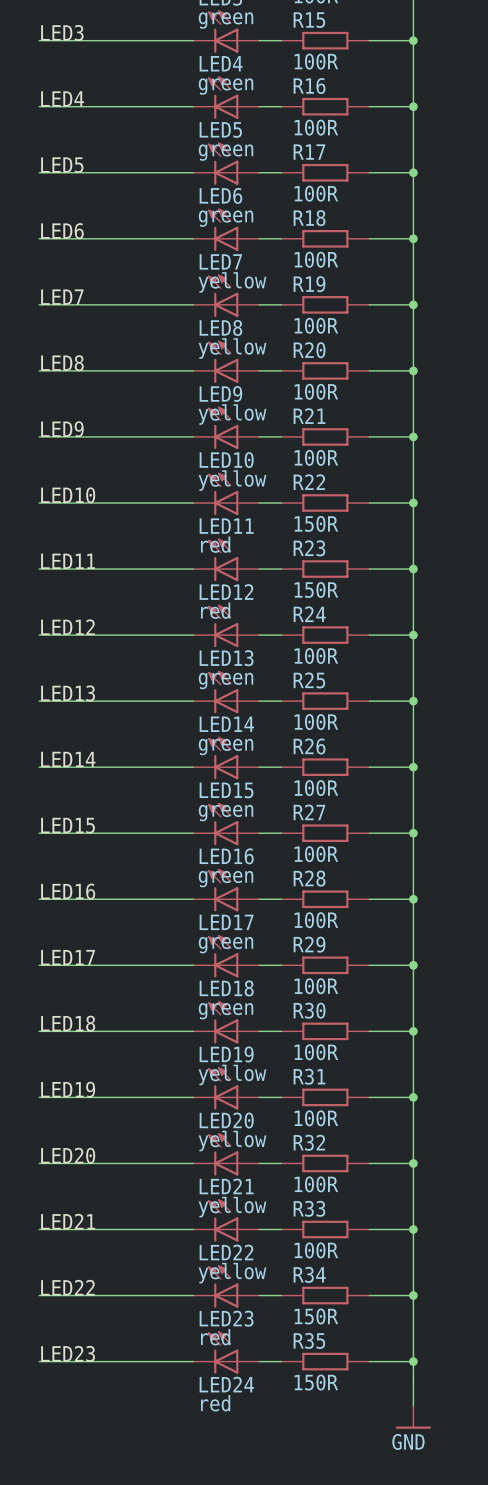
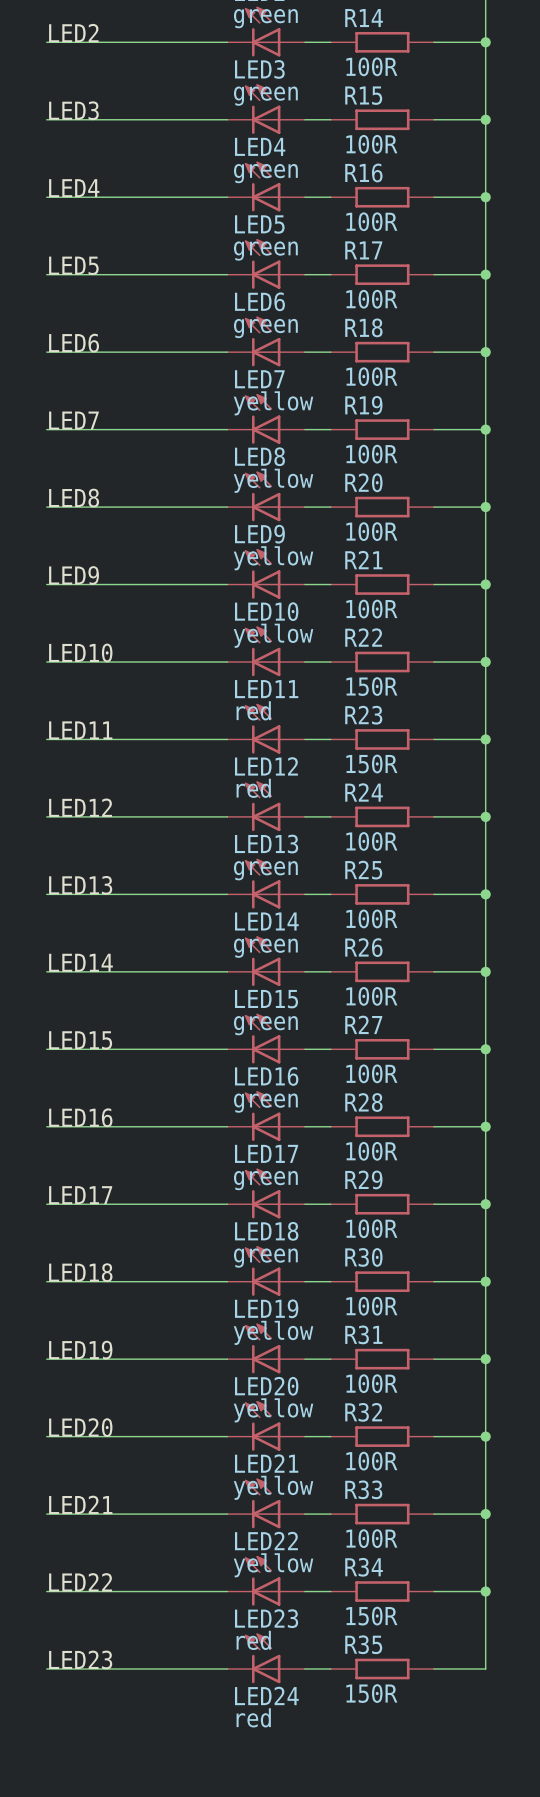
wire: (413, 1361) (413, 1405) -> none
junction: (413, 1361) -> none
power symbol: GND (413, 1417) -> none

